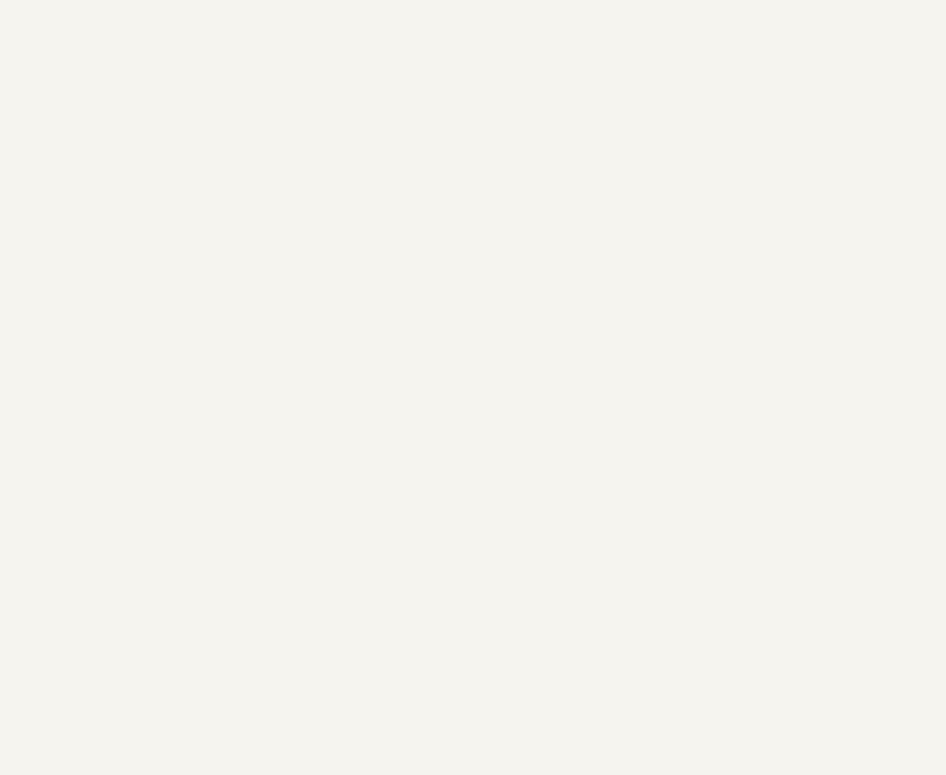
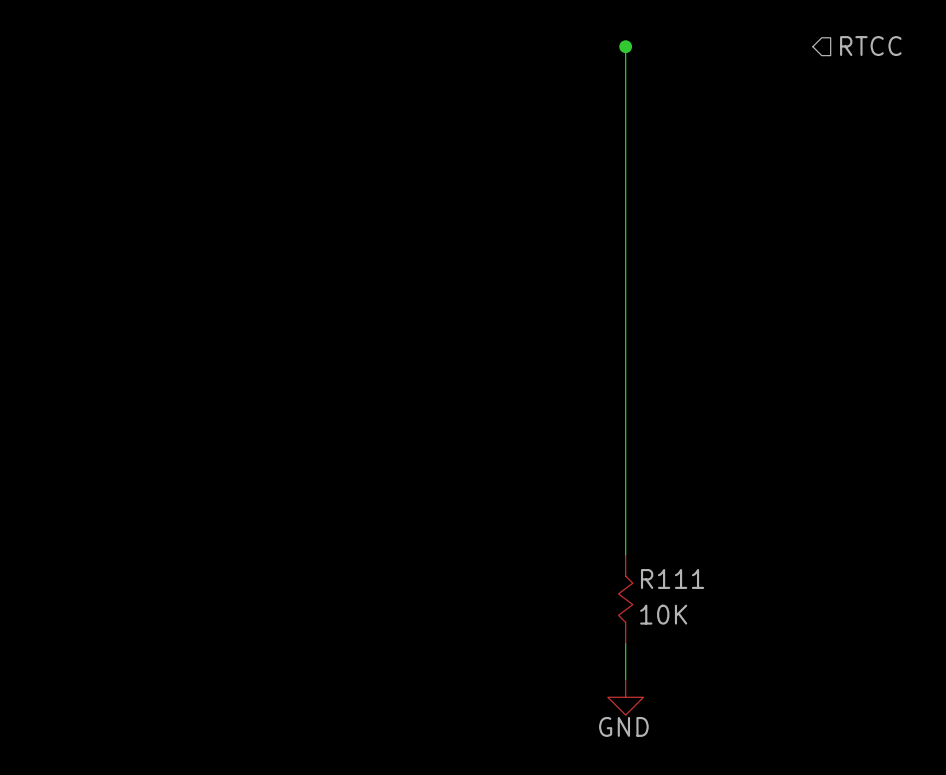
wire: none -> (625, 46) (625, 554)
junction: none -> (625, 46)
hierarchical label: none -> RTCC (870, 46)
R111: none -> 10K (625, 599)
wire: none -> (625, 643) (625, 679)
power symbol: none -> GND (625, 697)

